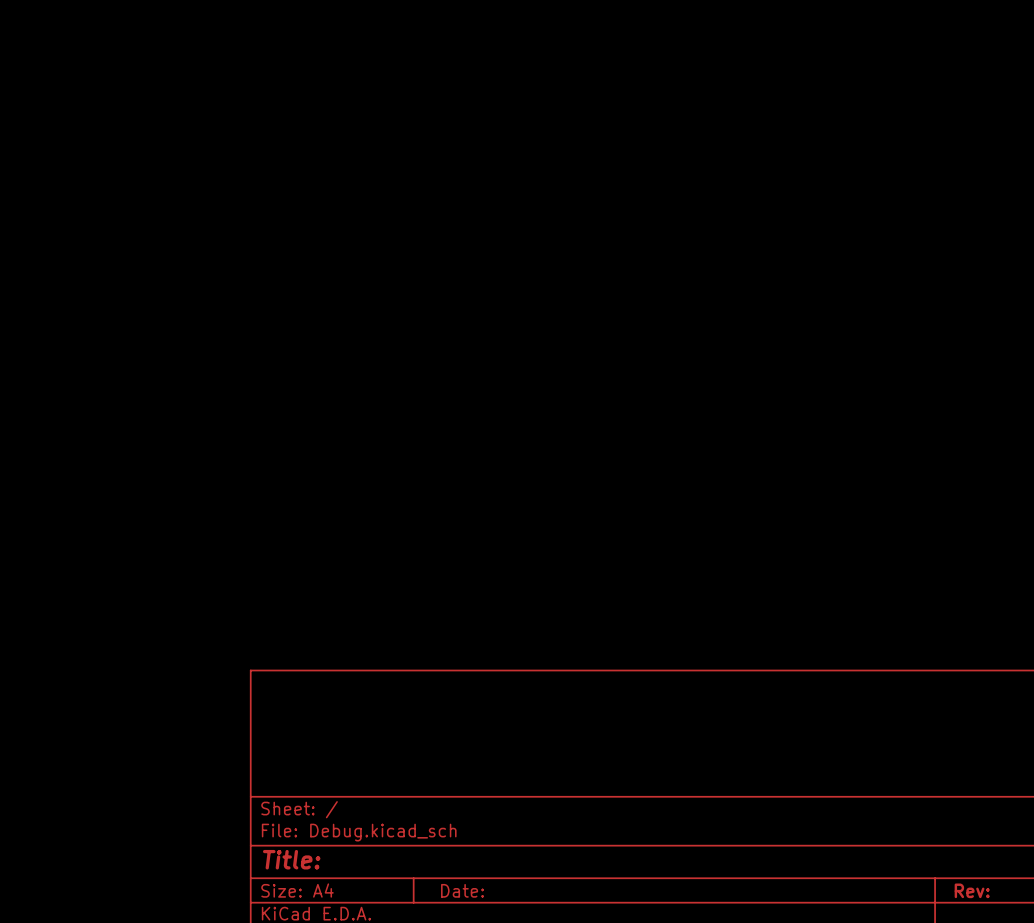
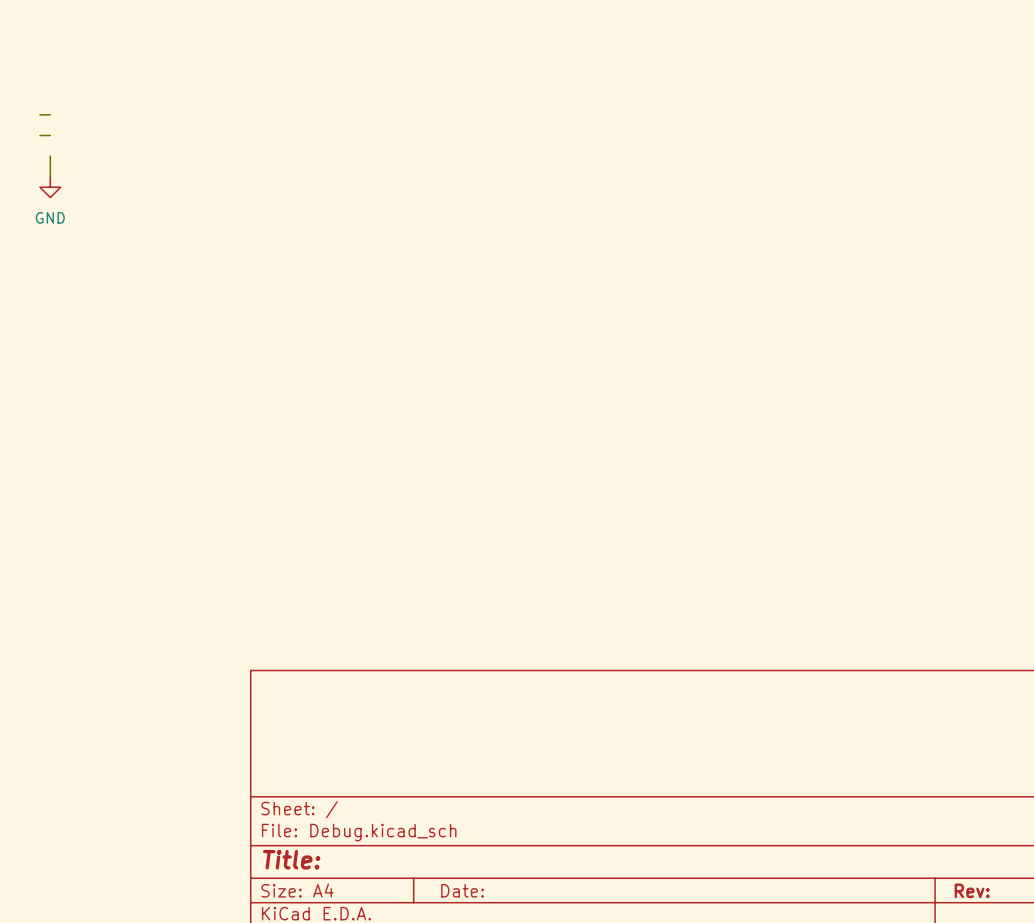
wire: none -> (39, 114) (50, 114)
wire: none -> (39, 135) (50, 135)
wire: none -> (50, 156) (50, 176)
power symbol: none -> GND (50, 187)

